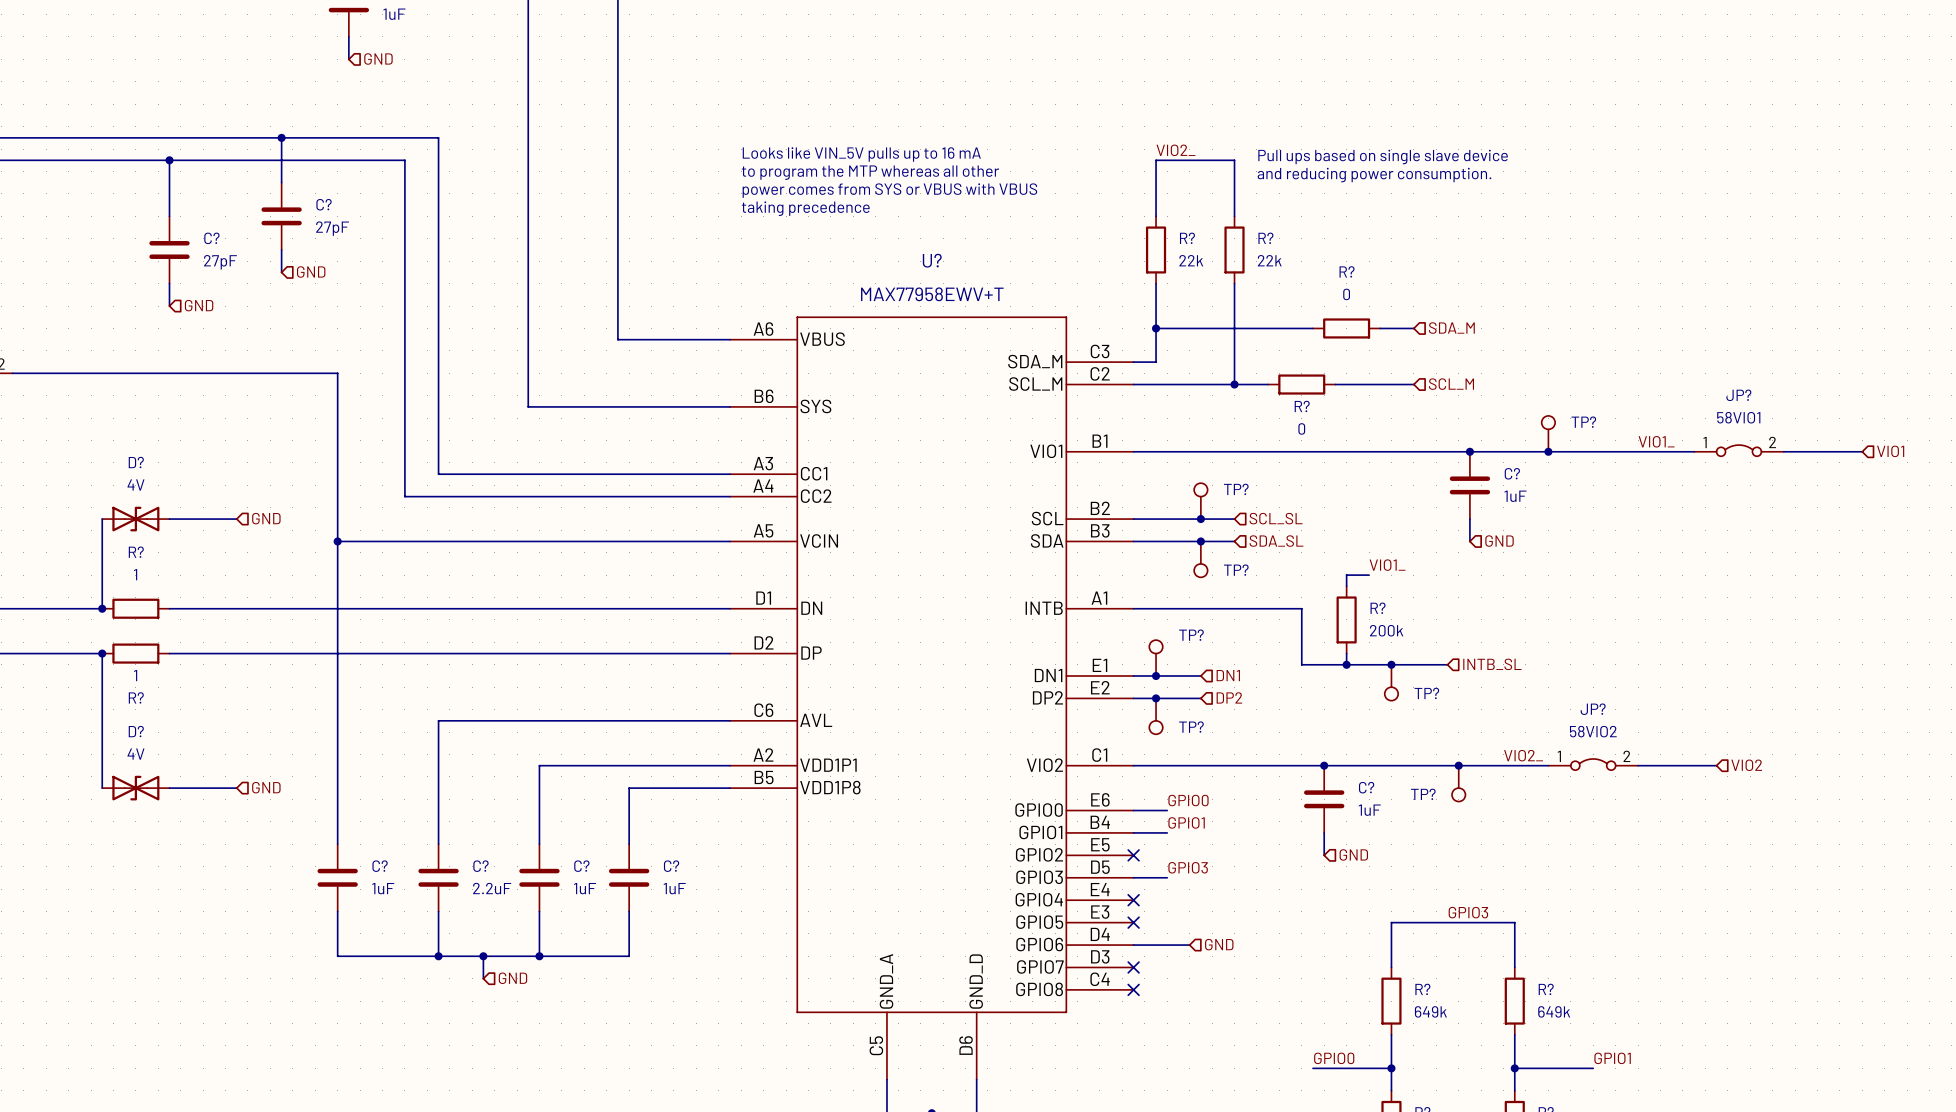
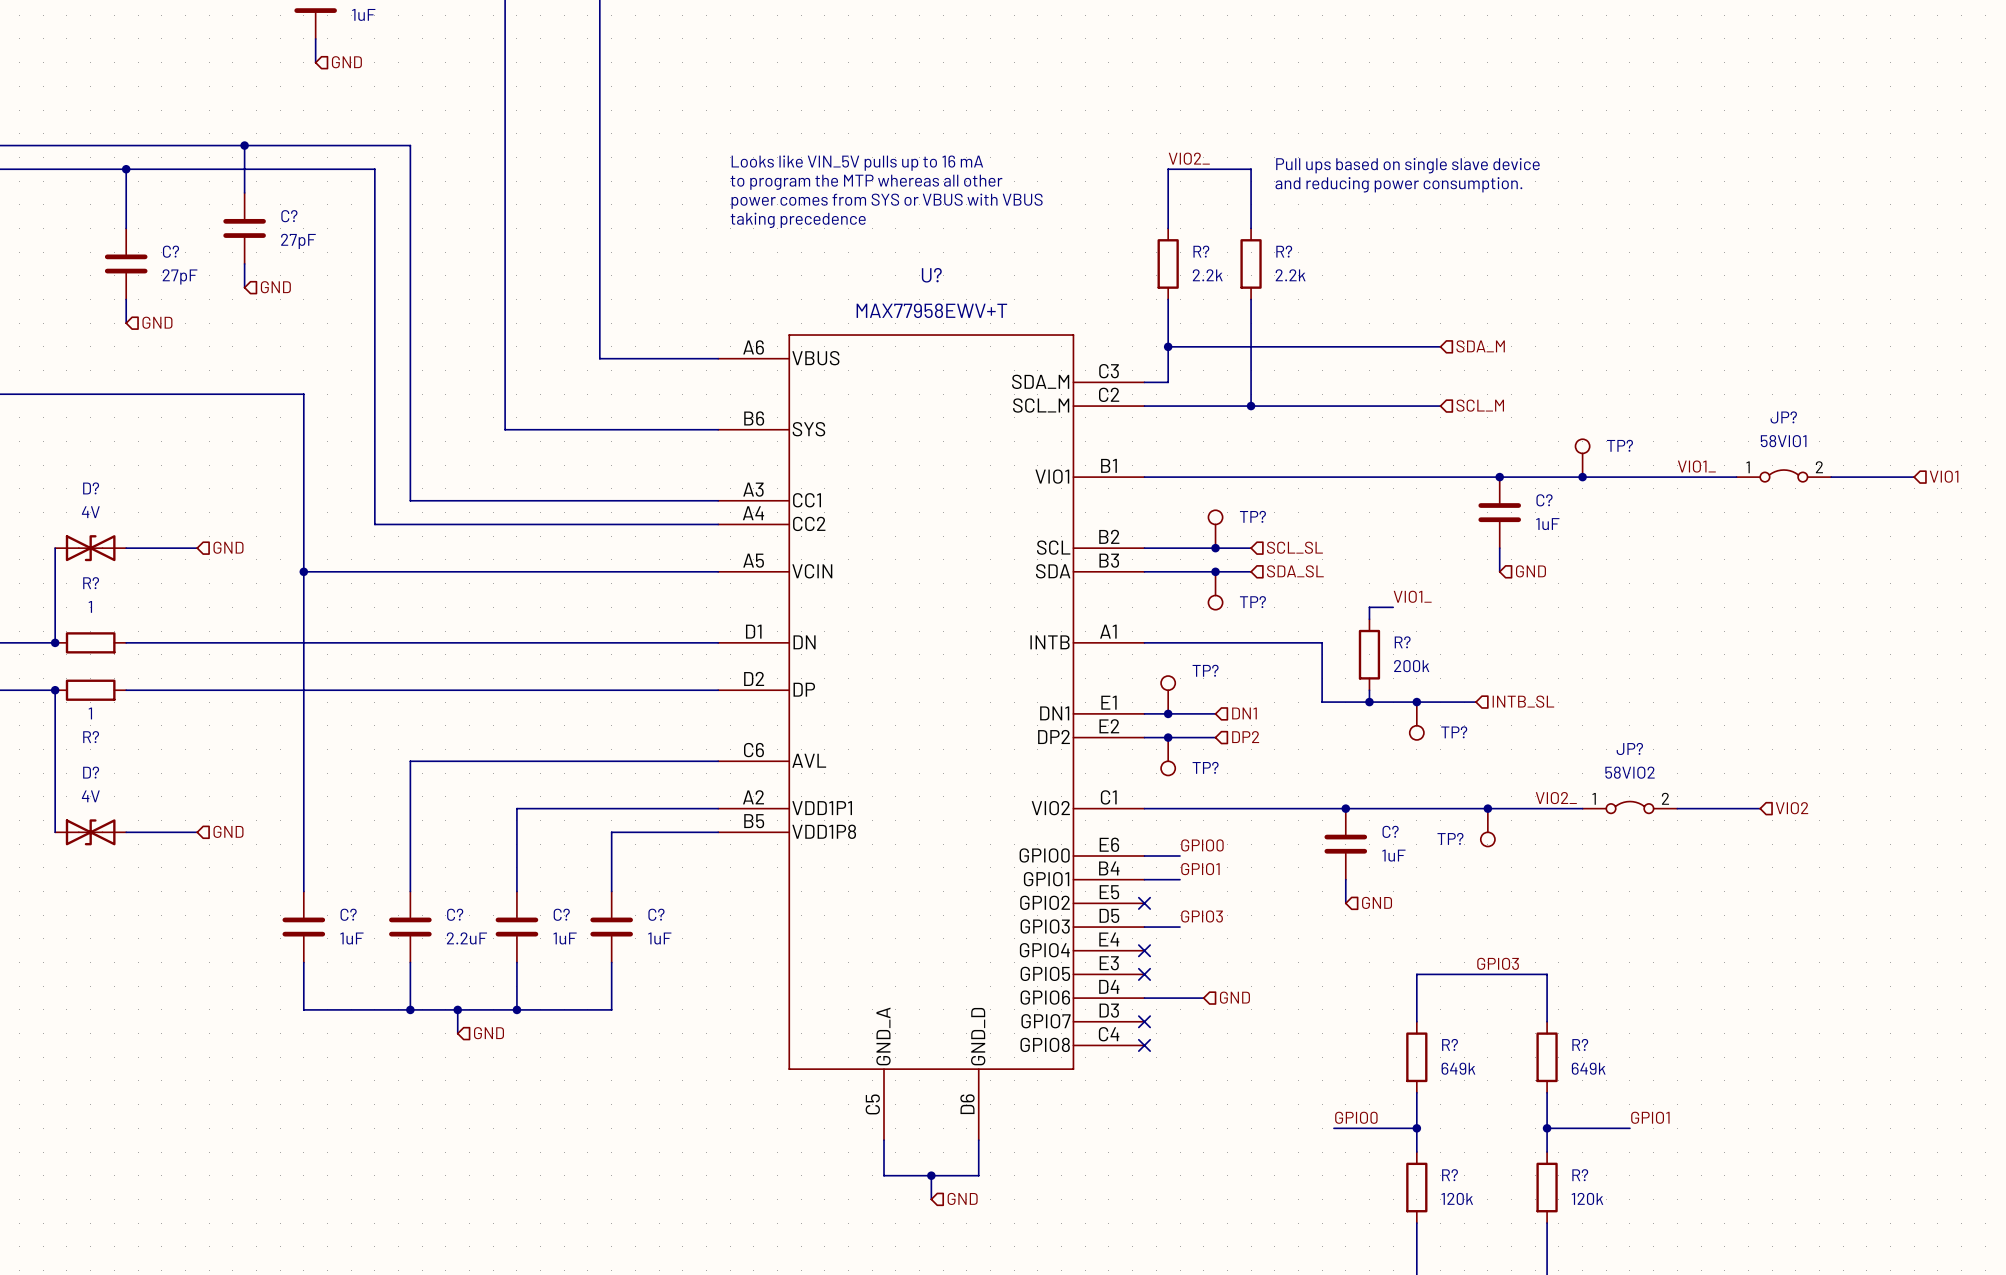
R? value: 22k (1191, 260) -> 2.2k (1207, 275)
R? value: 22k (1269, 260) -> 2.2k (1290, 275)
wire: none -> (1333, 346) (1404, 346)
R?: 0 (1346, 328) -> none
wire: none -> (1286, 406) (1357, 406)
R?: 0 (1301, 384) -> none

